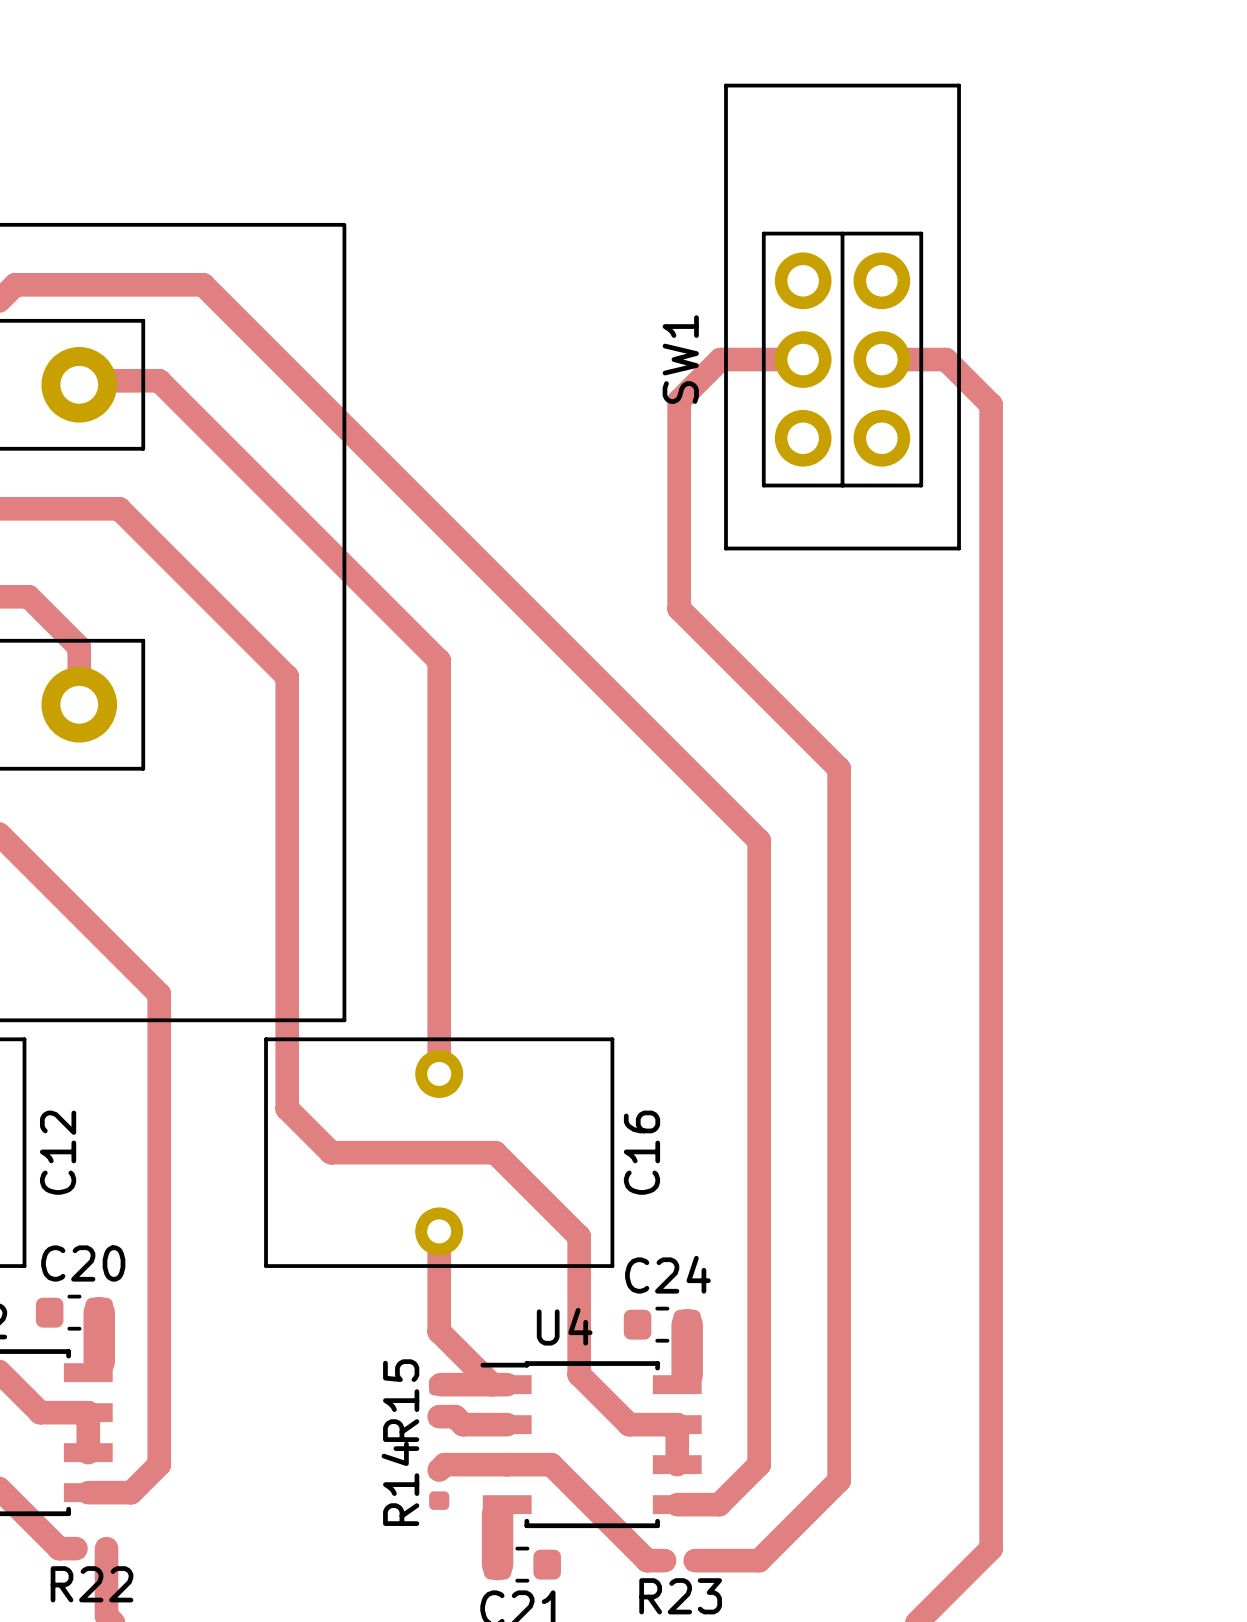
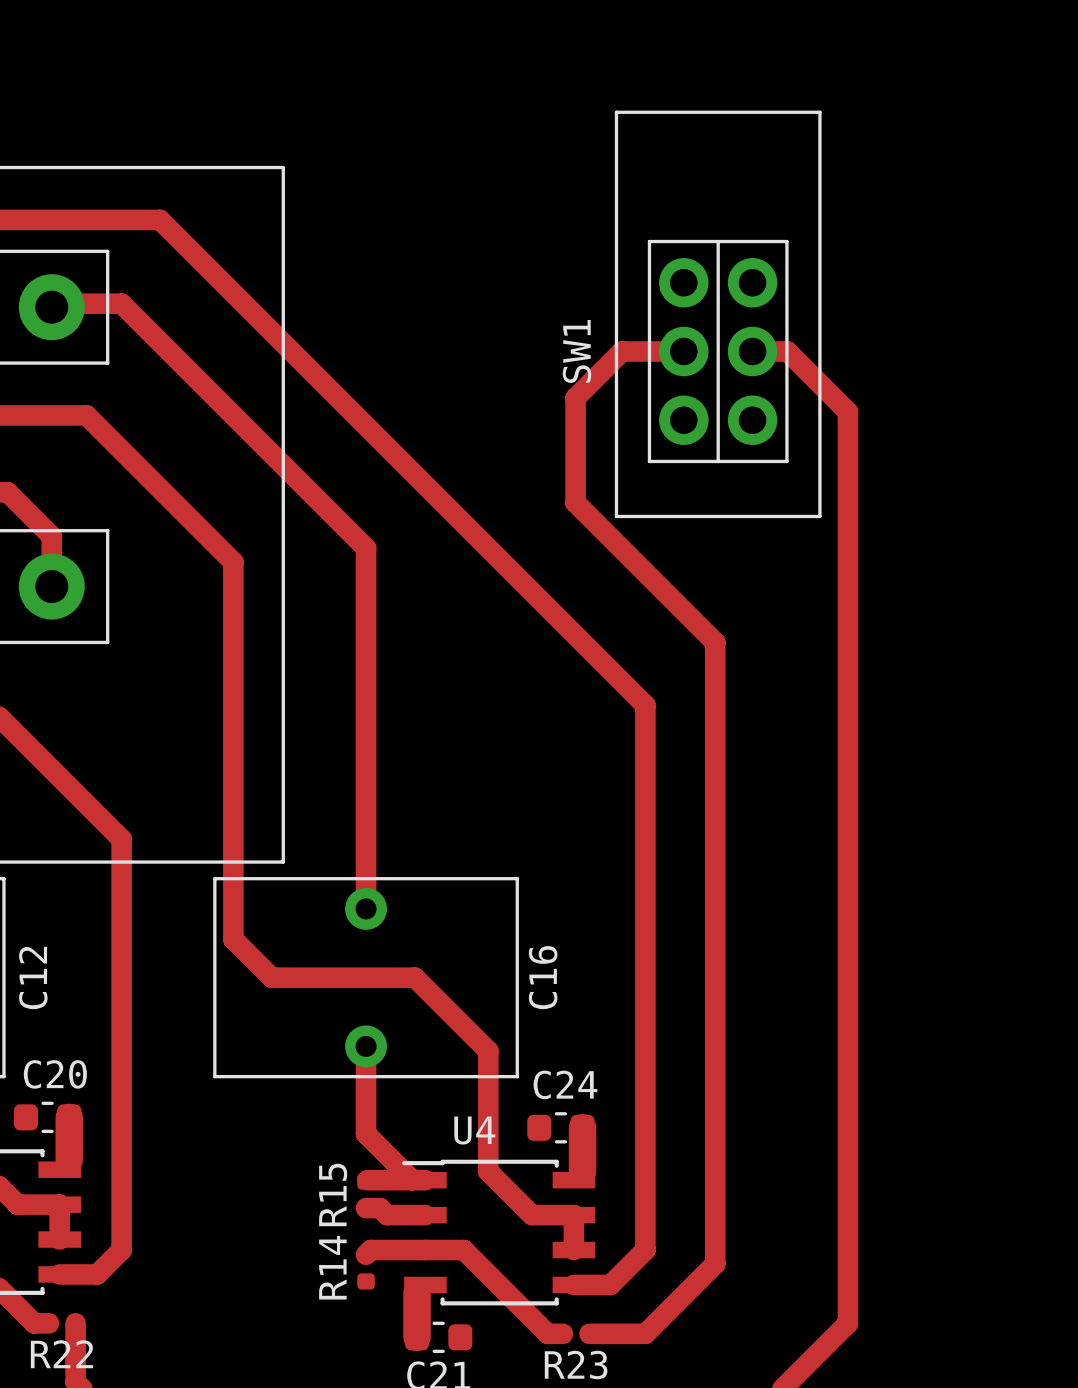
SW1 position: (842, 317) -> (718, 314)
top track: (803, 359) (720, 359) (679, 400) (679, 488) -> (683, 351) (622, 351) (575, 397)
top track: (881, 359) (945, 359) (991, 404) (991, 504) -> (752, 351) (787, 351) (847, 411)

